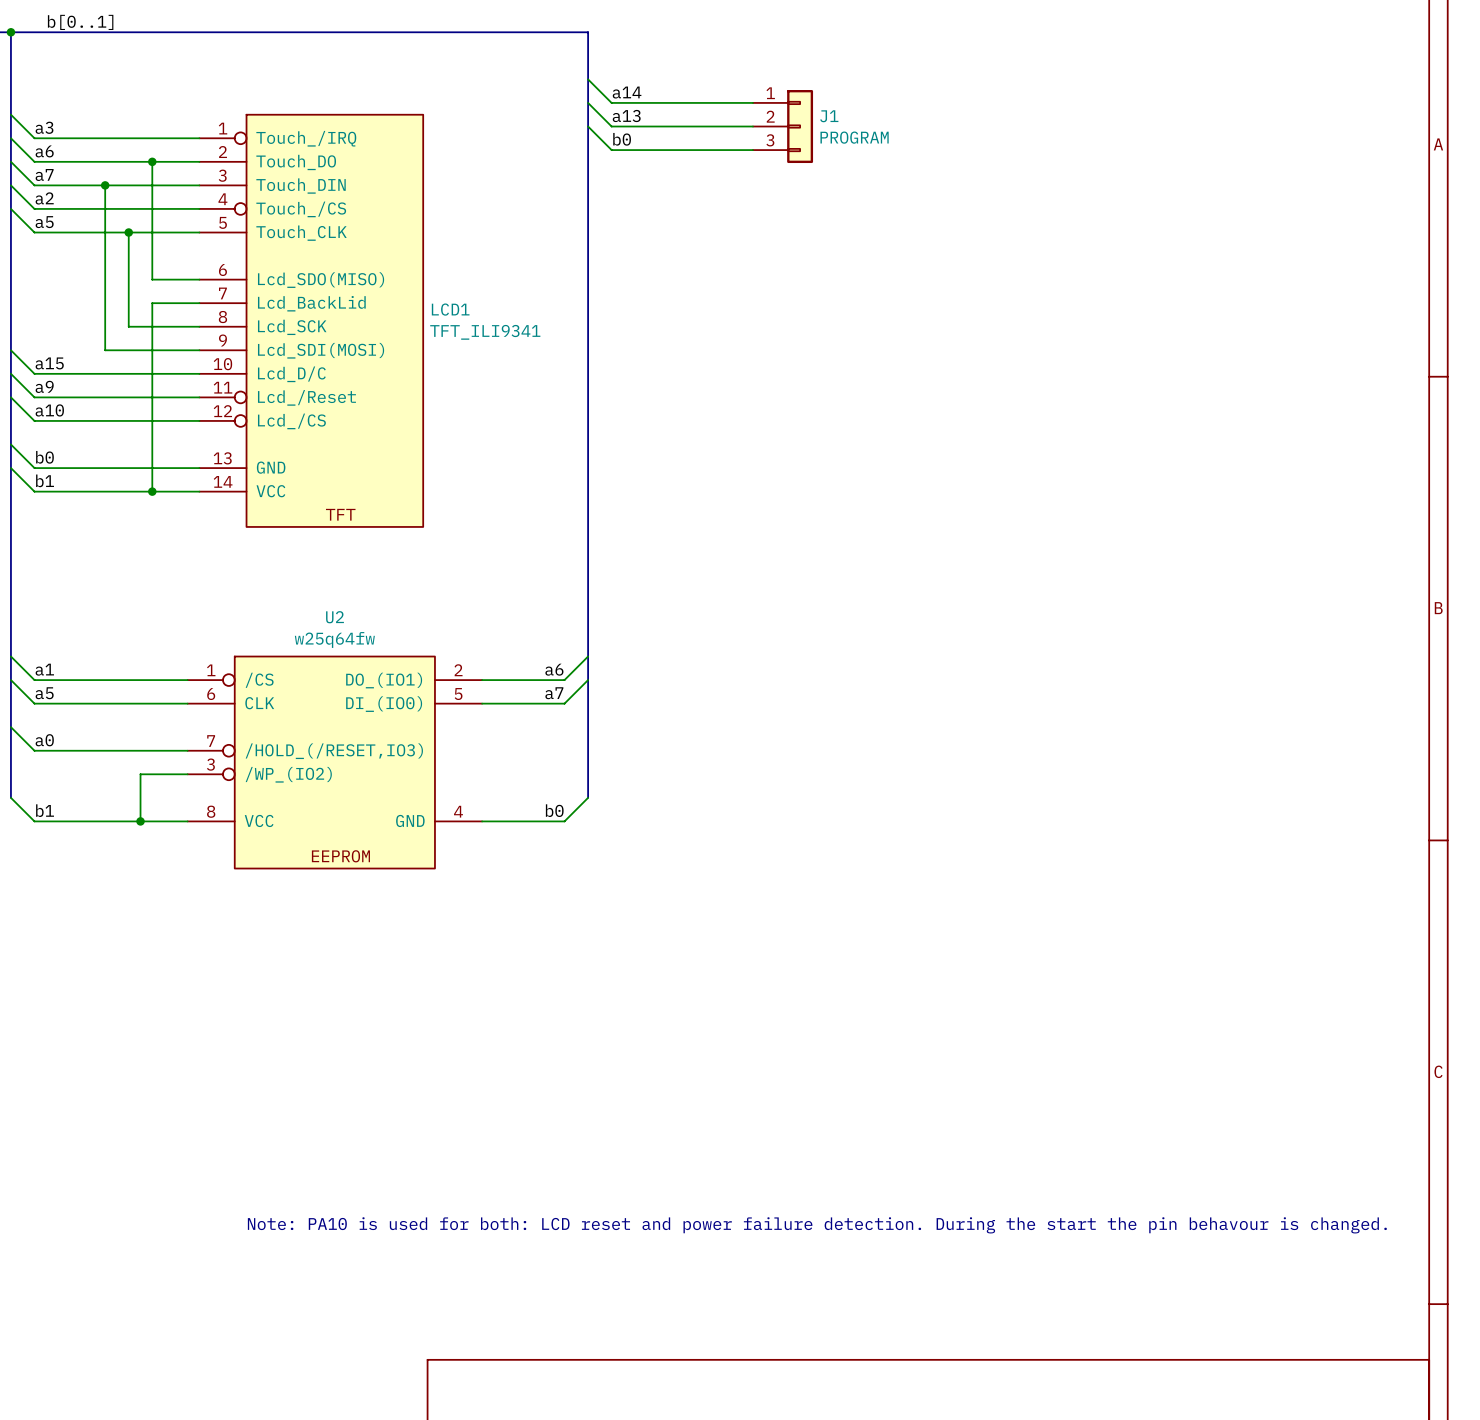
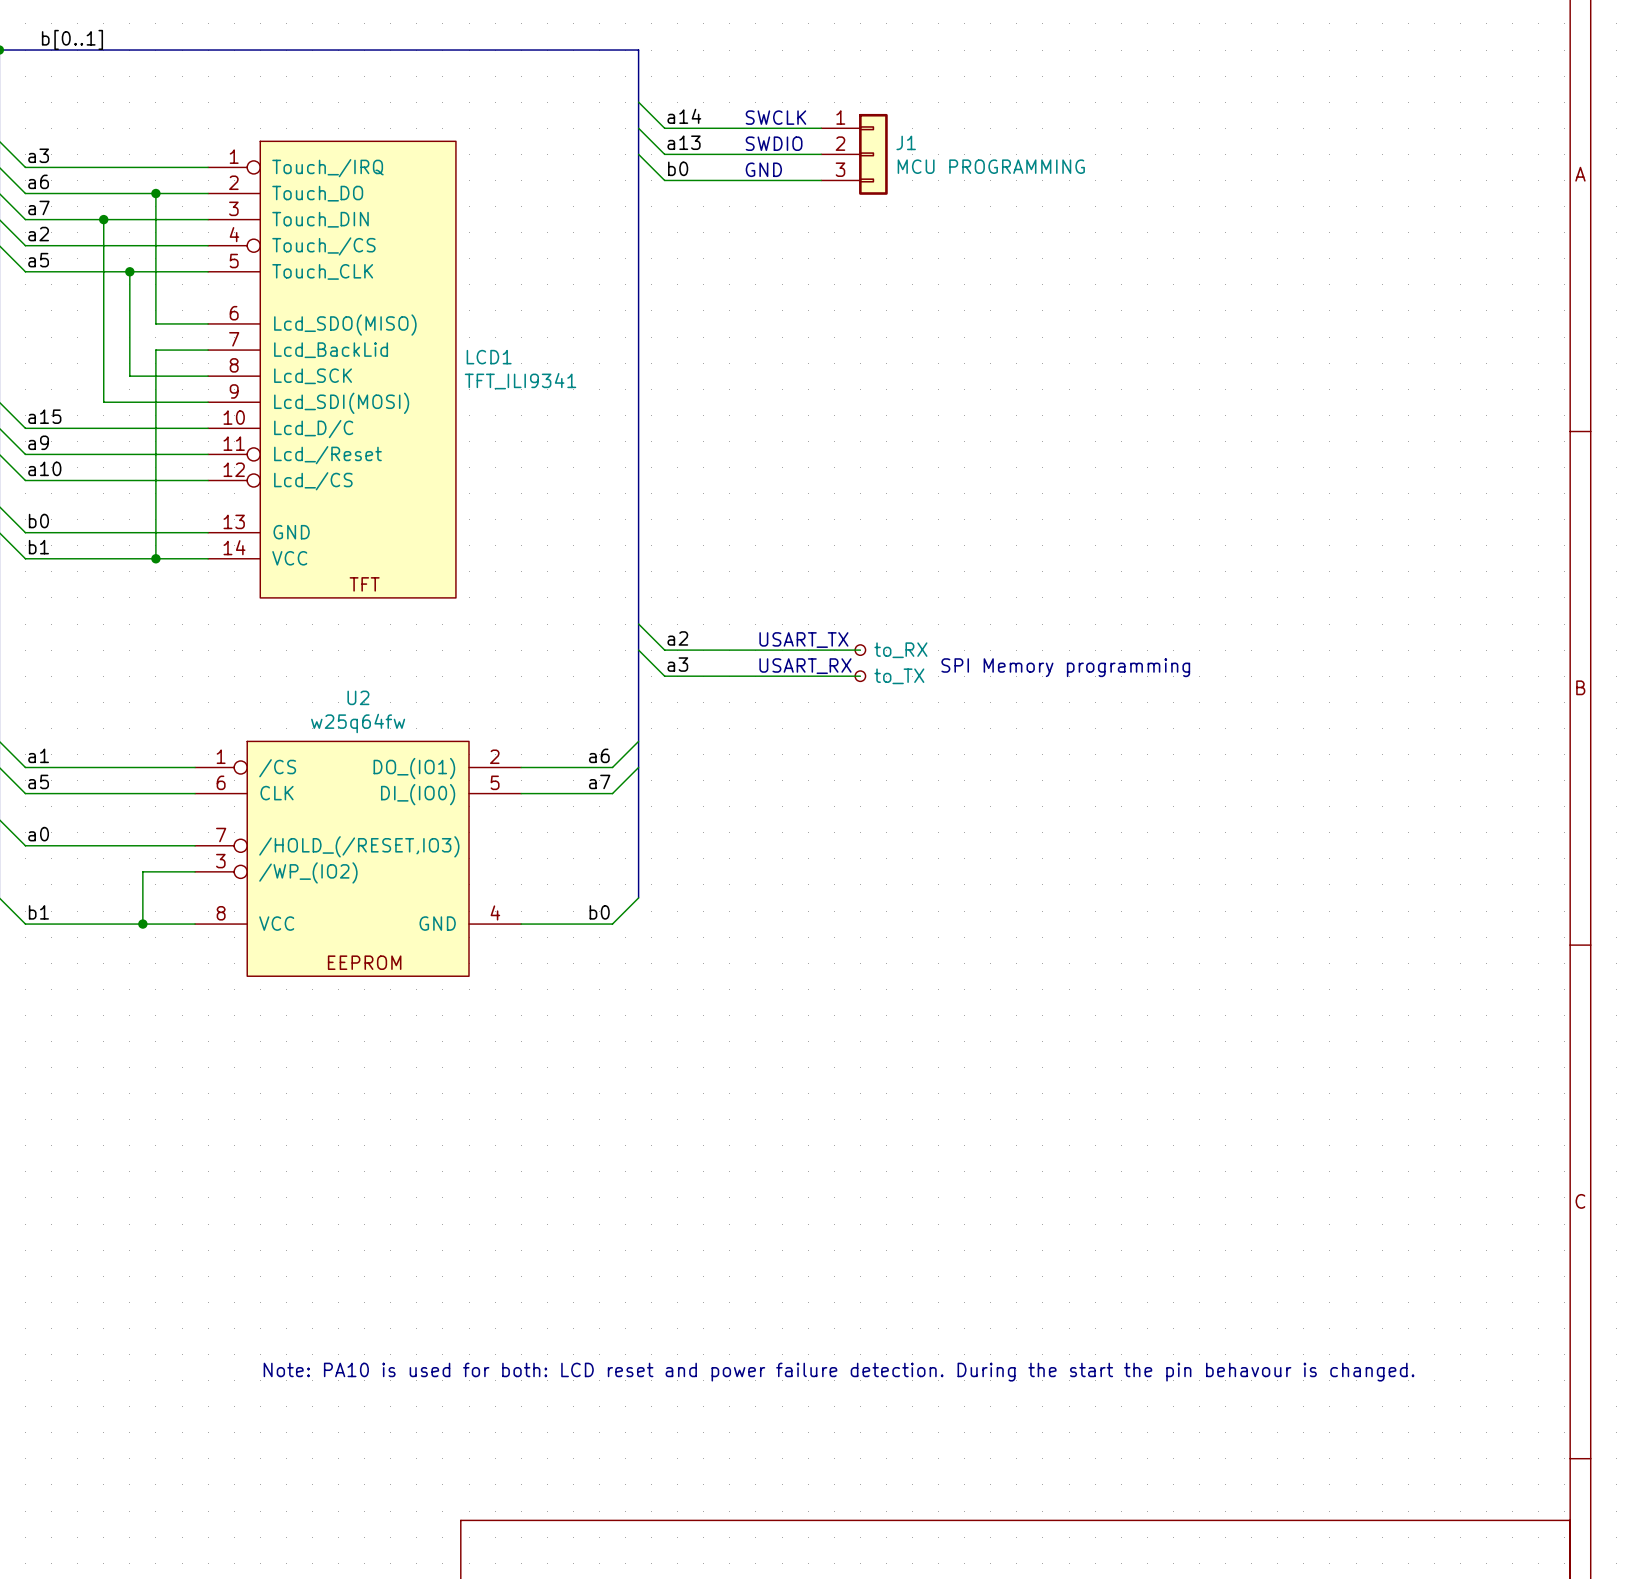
text: none -> SWCLK (775, 117)
text: none -> SWDIO (774, 143)
J1 value: PROGRAM (854, 137) -> MCU PROGRAMMING (991, 166)
text: none -> GND (763, 169)
wire: none -> (638, 624) (664, 650) (860, 650)
label: none -> a2 (677, 638)
text: none -> USART_TX (803, 640)
wire: none -> (638, 650) (664, 676) (860, 676)
to_RX: none -> (860, 650)
label: none -> a3 (677, 664)
text: none -> USART_RX (805, 666)
text: none -> SPI Memory programming (1065, 667)
to_TX: none -> (860, 676)

